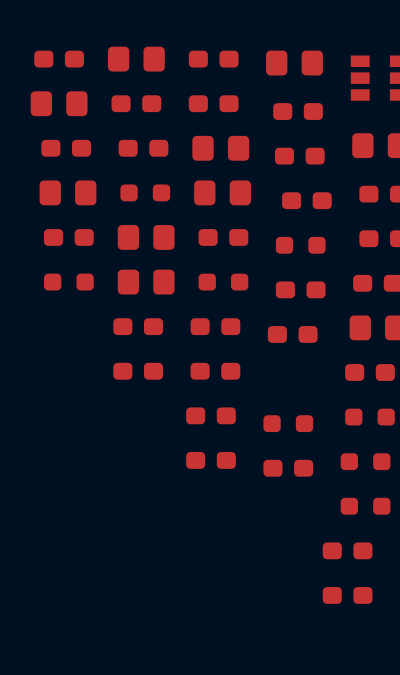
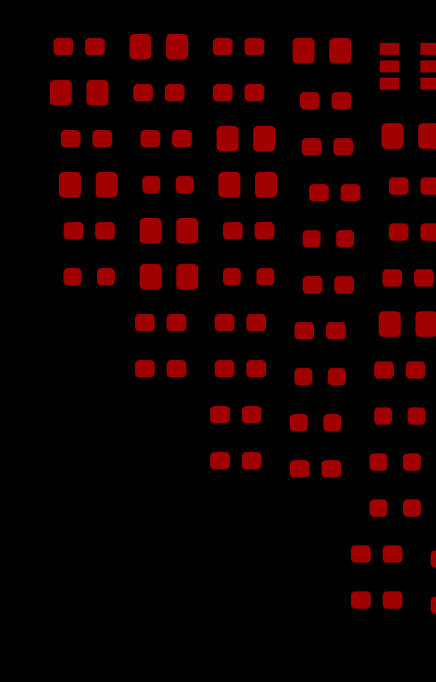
part: none -> (320, 376)

